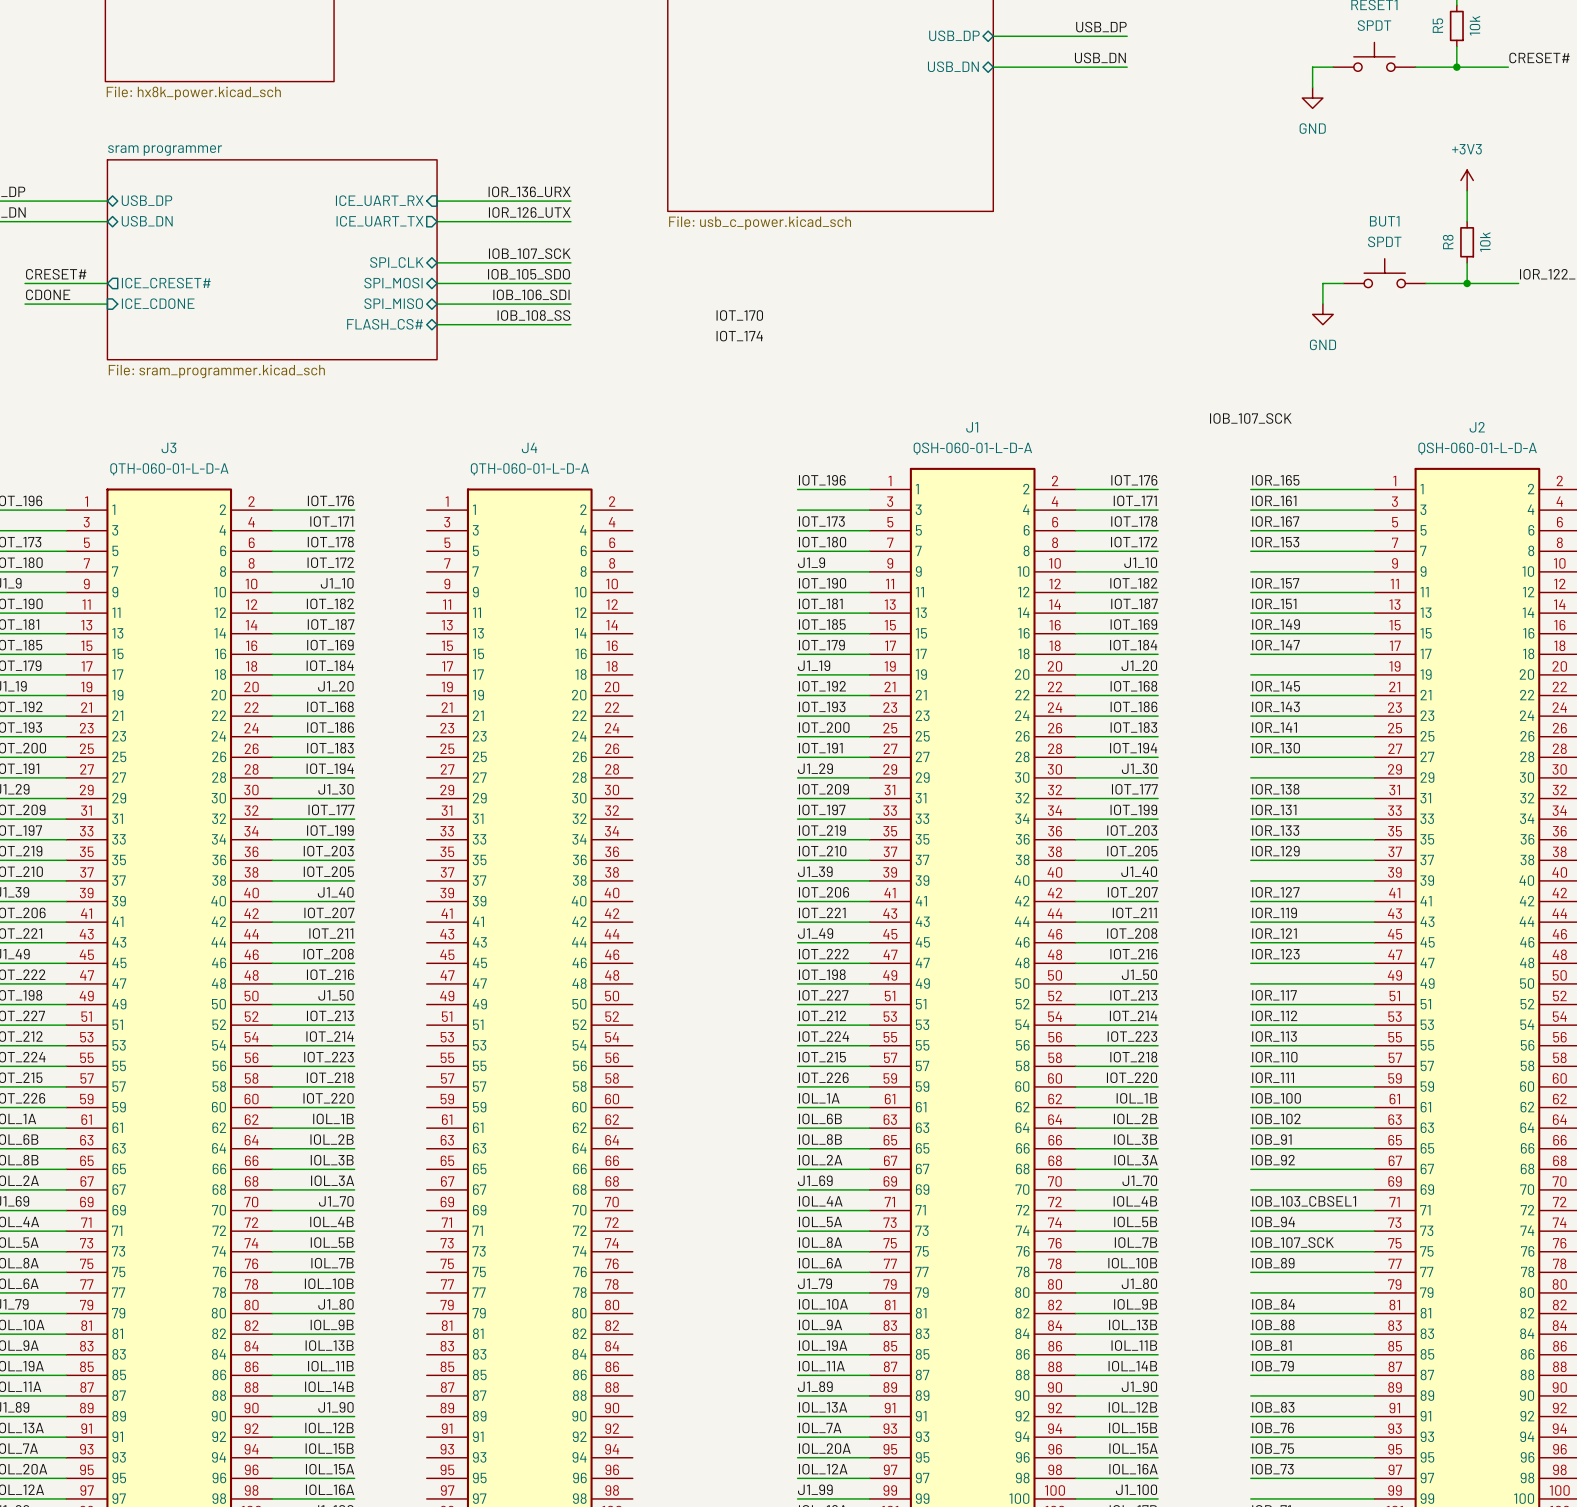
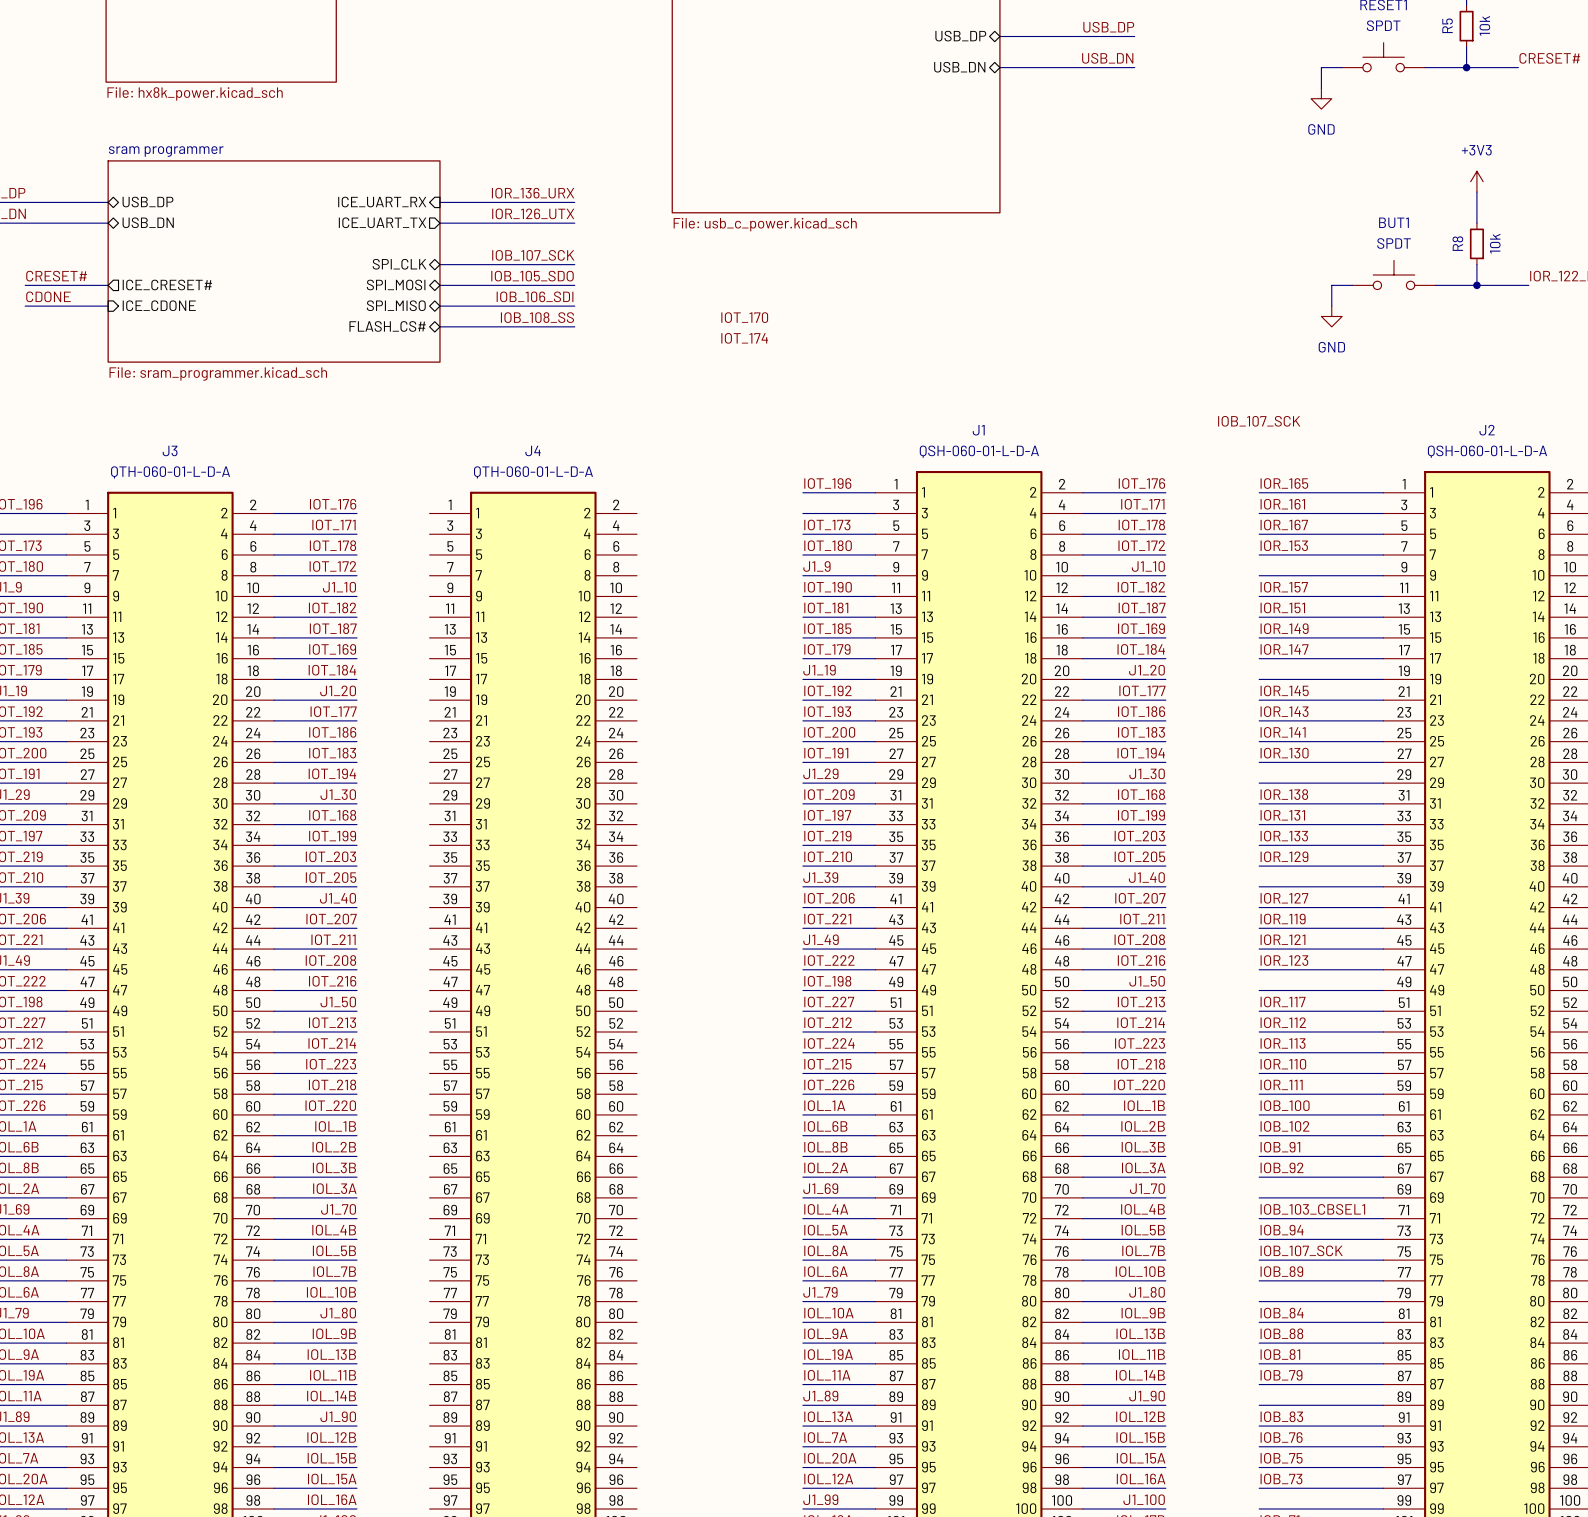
label: IOT_168 (1133, 686) -> IOT_177 (1142, 690)
label: IOT_168 (330, 706) -> IOT_177 (333, 711)
label: IOT_177 (1134, 789) -> IOT_168 (1141, 794)
label: IOT_177 (331, 809) -> IOT_168 (332, 815)

